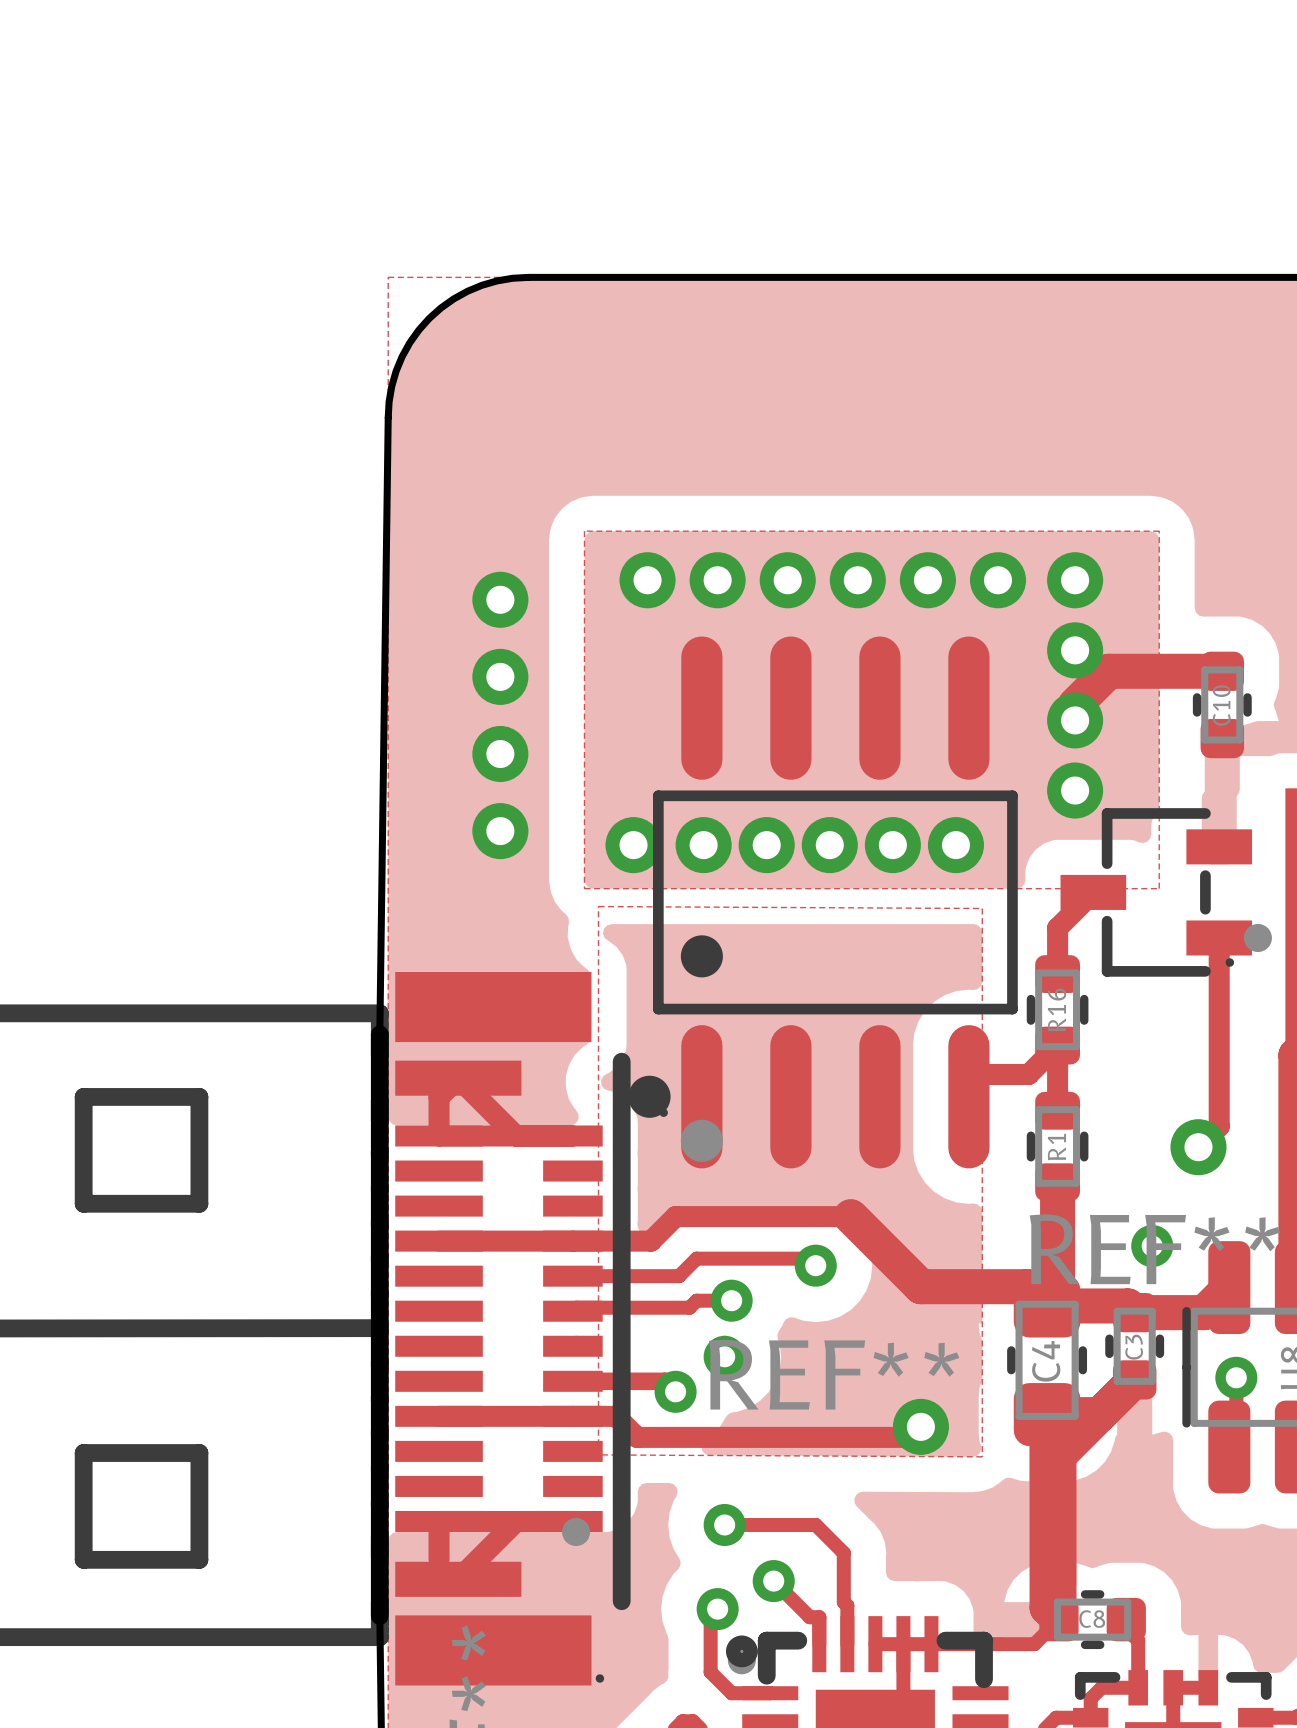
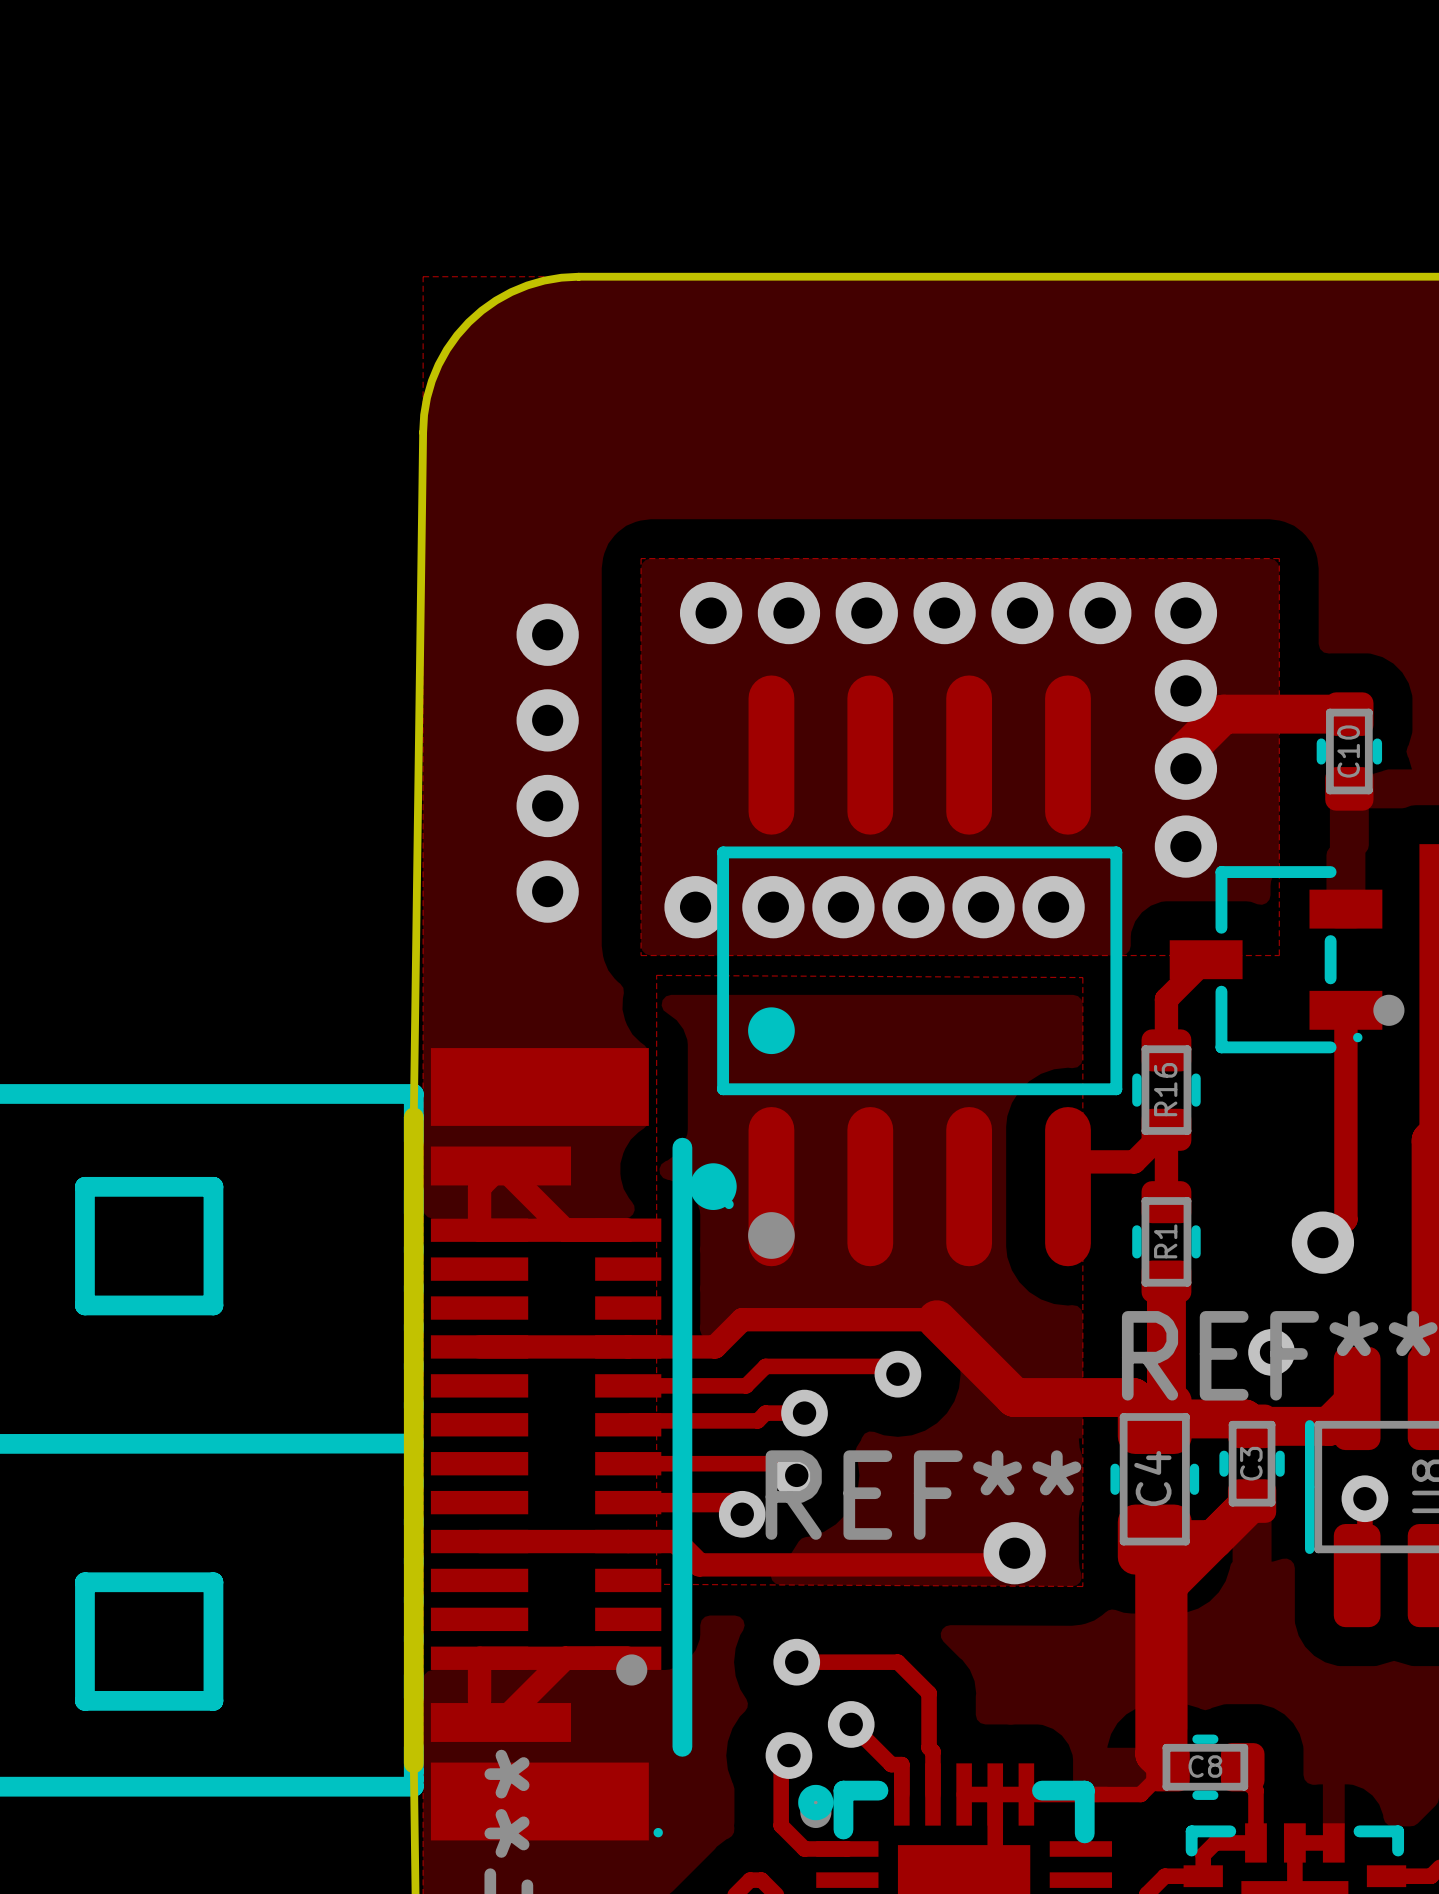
track: none -> (628, 1463) (785, 1463) (796, 1475)

